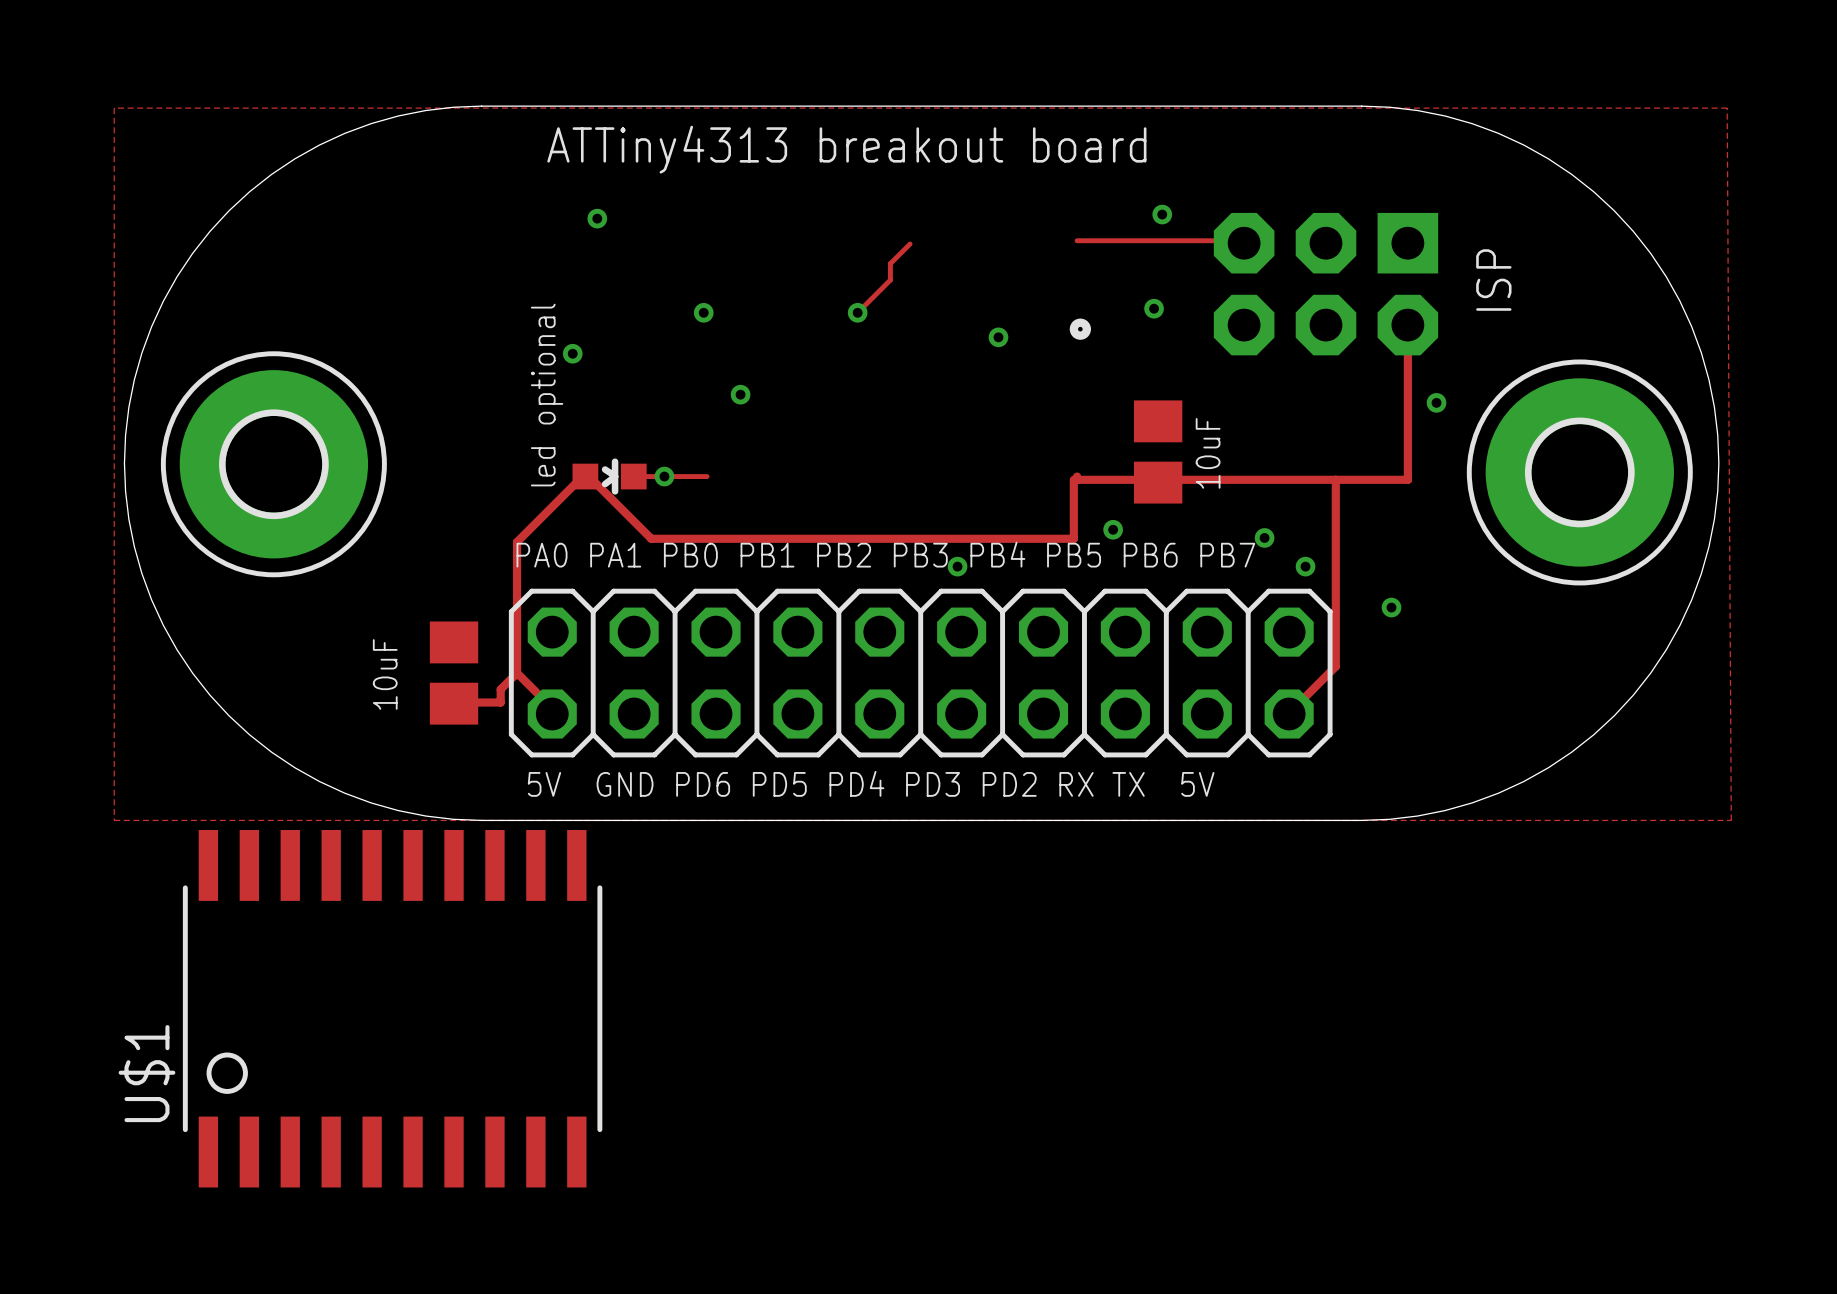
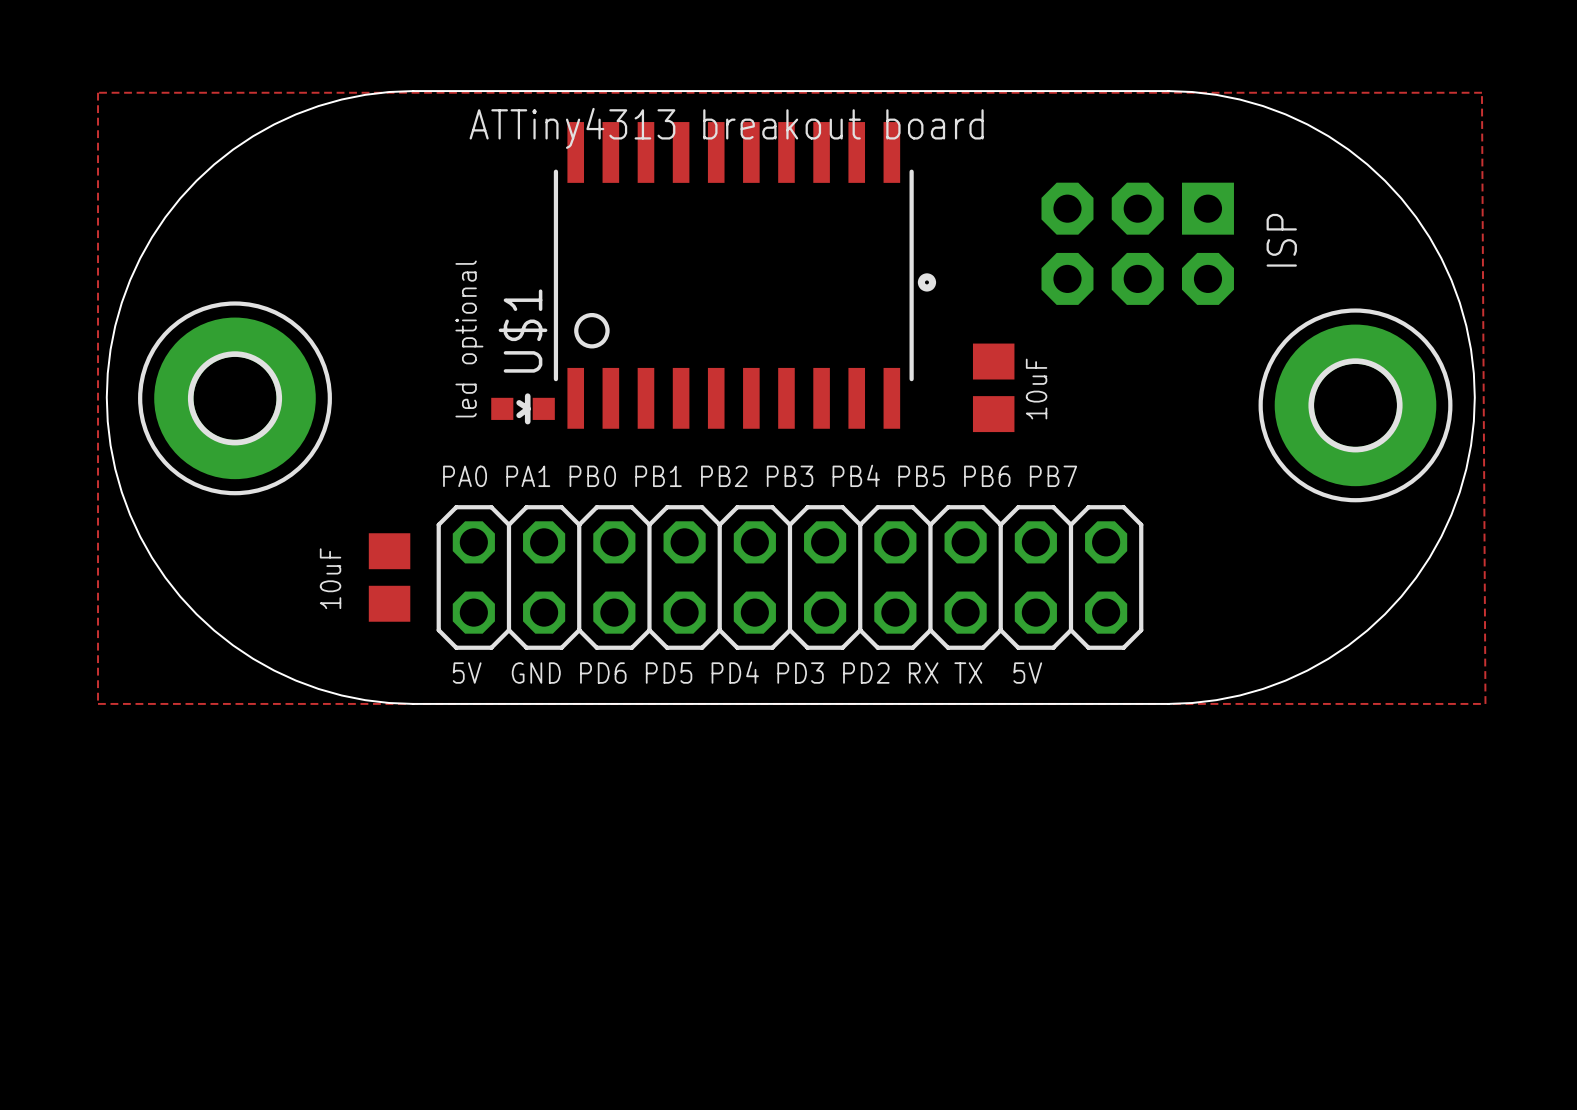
via: (1162, 214) -> none
via: (597, 218) -> none
track: (1077, 240) (1244, 240) (1244, 243) -> none
track: (910, 244) (890, 263) (890, 280) (857, 312) -> none
via: (1154, 308) -> none
via: (703, 312) -> none
via: (857, 312) -> none
track: (1407, 325) (1407, 479) (1158, 479) (1158, 482) (1155, 479) (1077, 479) (1077, 476) -> none
via: (998, 337) -> none
via: (572, 353) -> none
via: (740, 394) -> none
via: (1436, 402) -> none
track: (633, 476) (707, 476) -> none
via: (664, 476) -> none
track: (1073, 479) (1073, 538) (651, 538) (589, 476) (582, 476) (517, 542) (517, 673) -> none
track: (1335, 479) (1335, 666) (1289, 713) -> none
via: (1113, 529) -> none
via: (1264, 537) -> none
via: (957, 566) -> none
via: (1305, 566) -> none
via: (1391, 607) -> none
track: (517, 673) (549, 705) (549, 712) (552, 713) -> none
track: (517, 673) (513, 673) (513, 676) (500, 689) (500, 702) (454, 703) -> none
U$1 position: (392, 1008) -> (733, 275)

